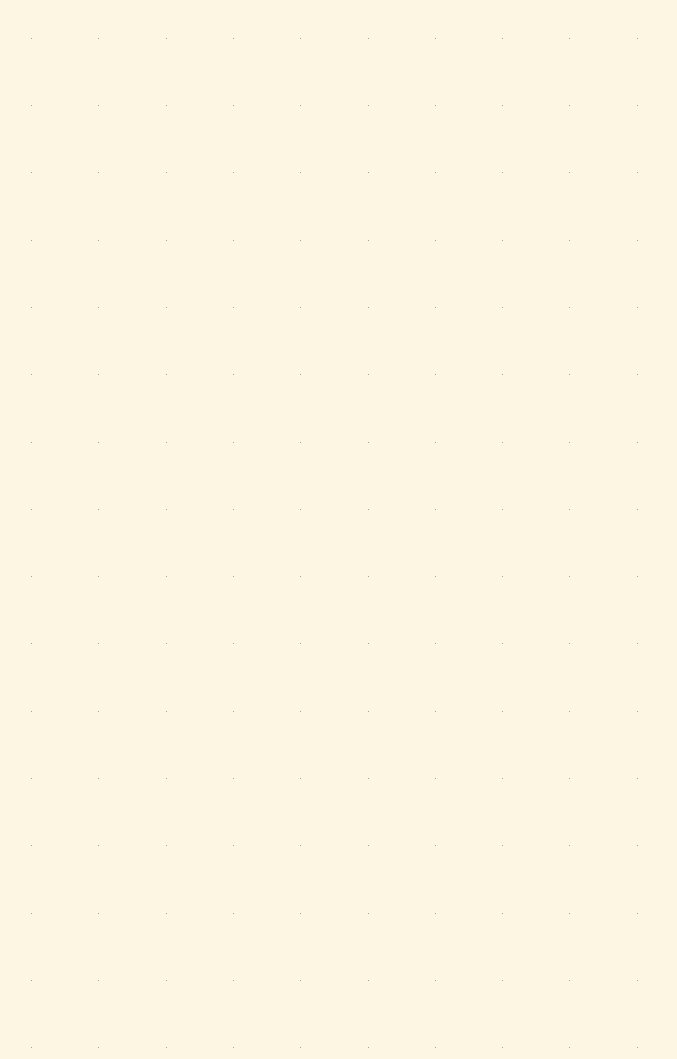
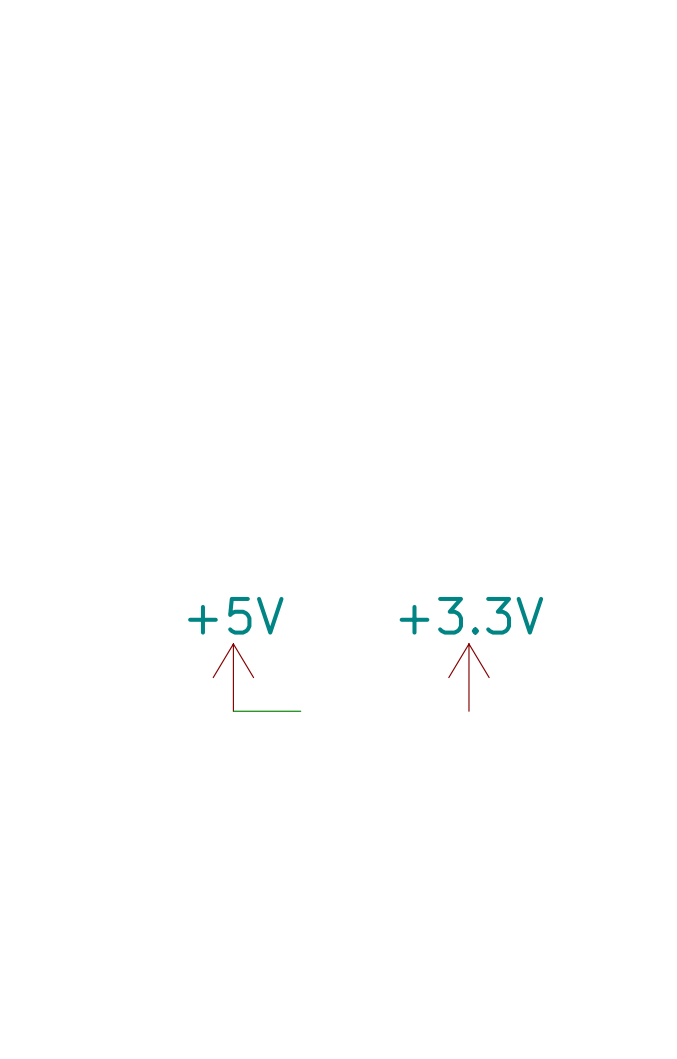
power symbol: none -> +5V (233, 677)
power symbol: none -> +3.3V (468, 677)
wire: none -> (233, 711) (300, 711)

